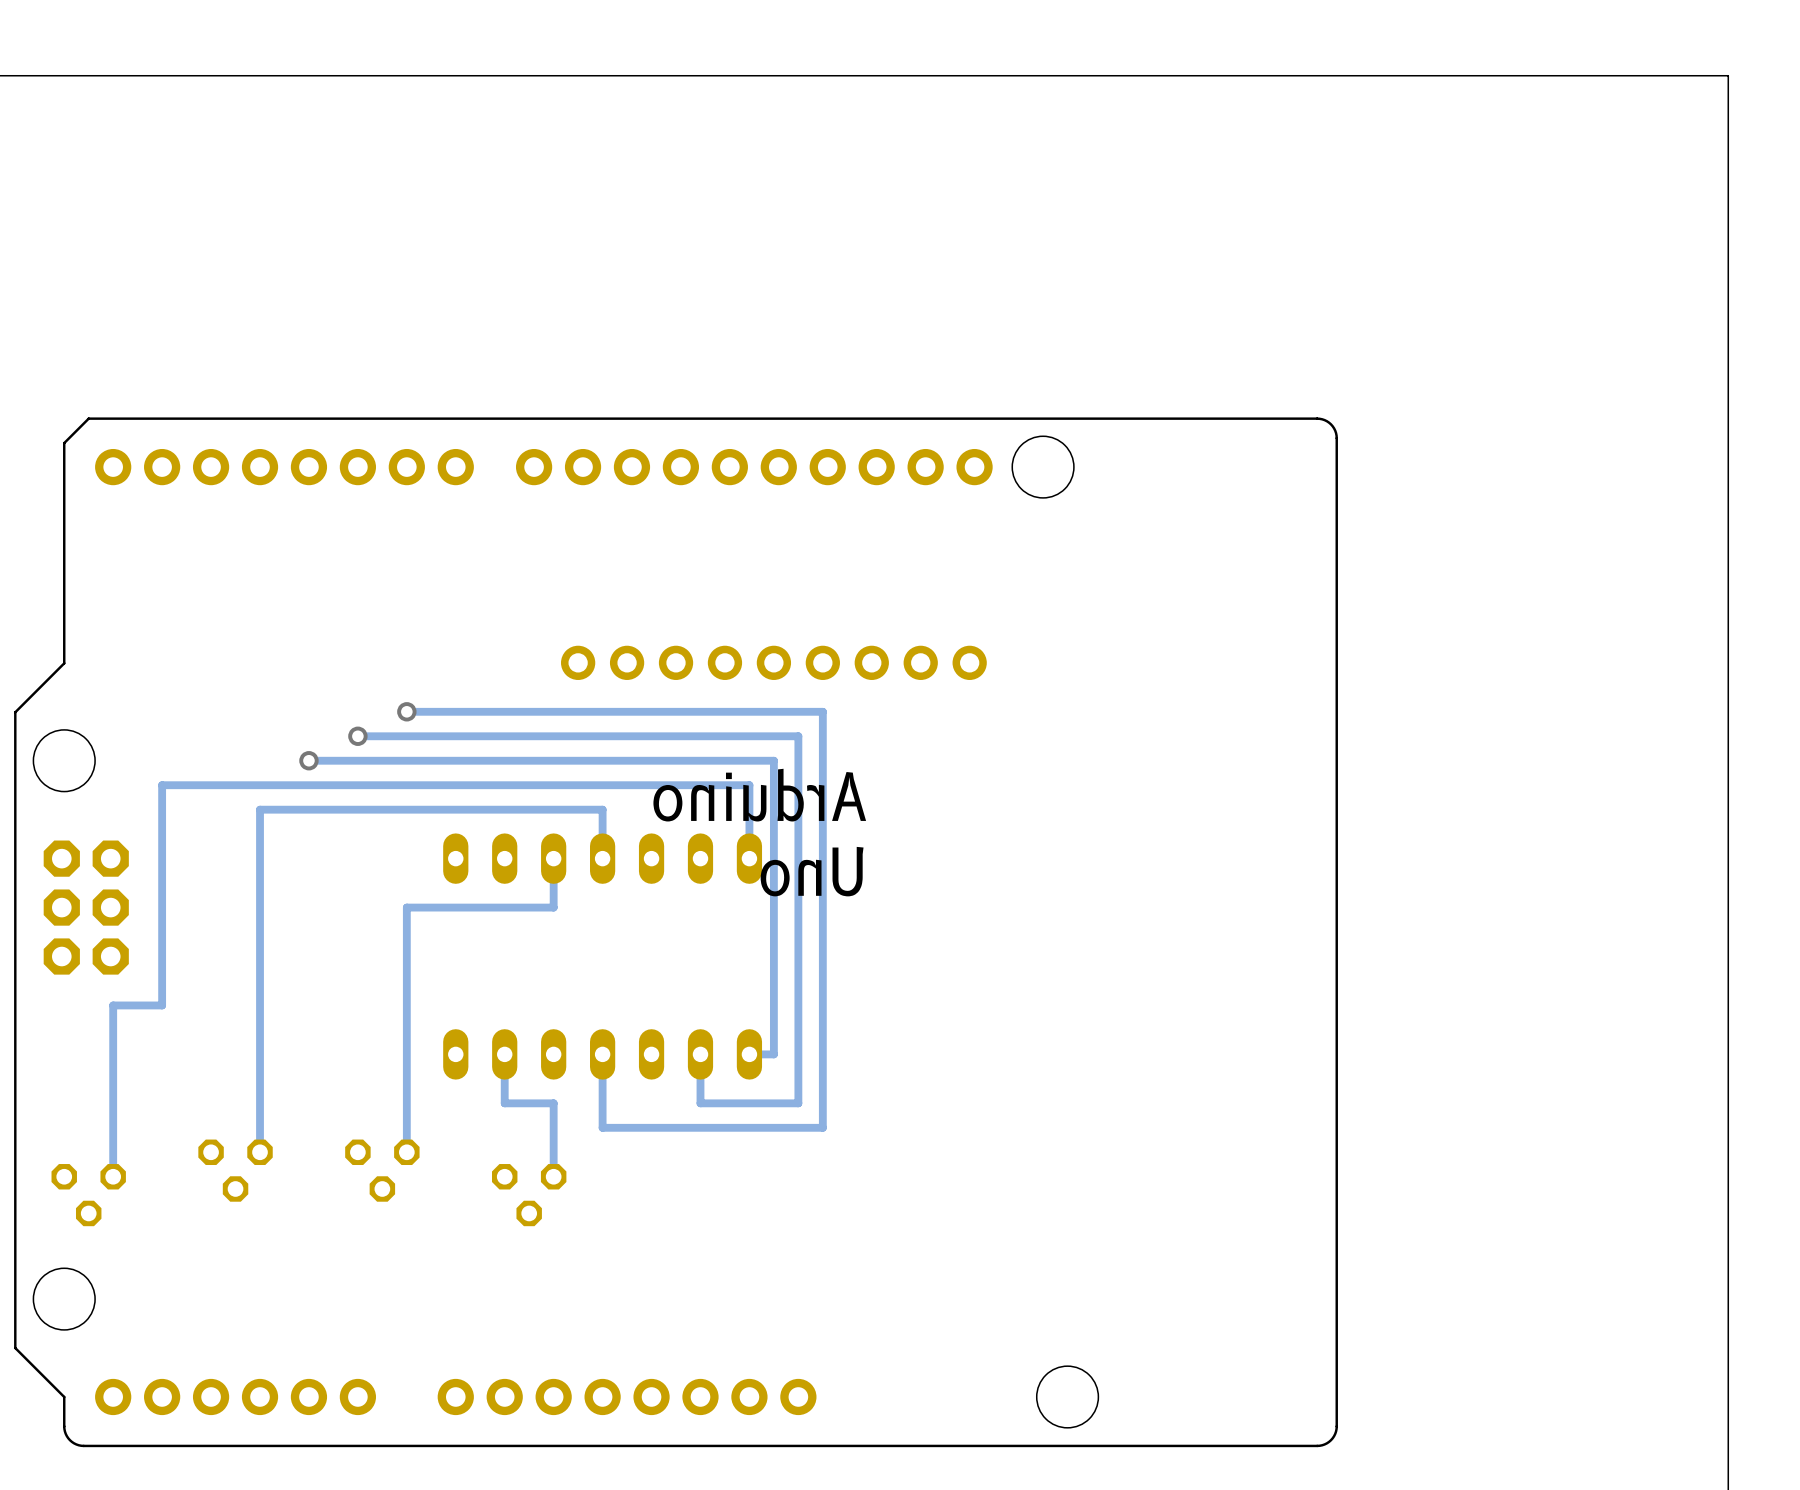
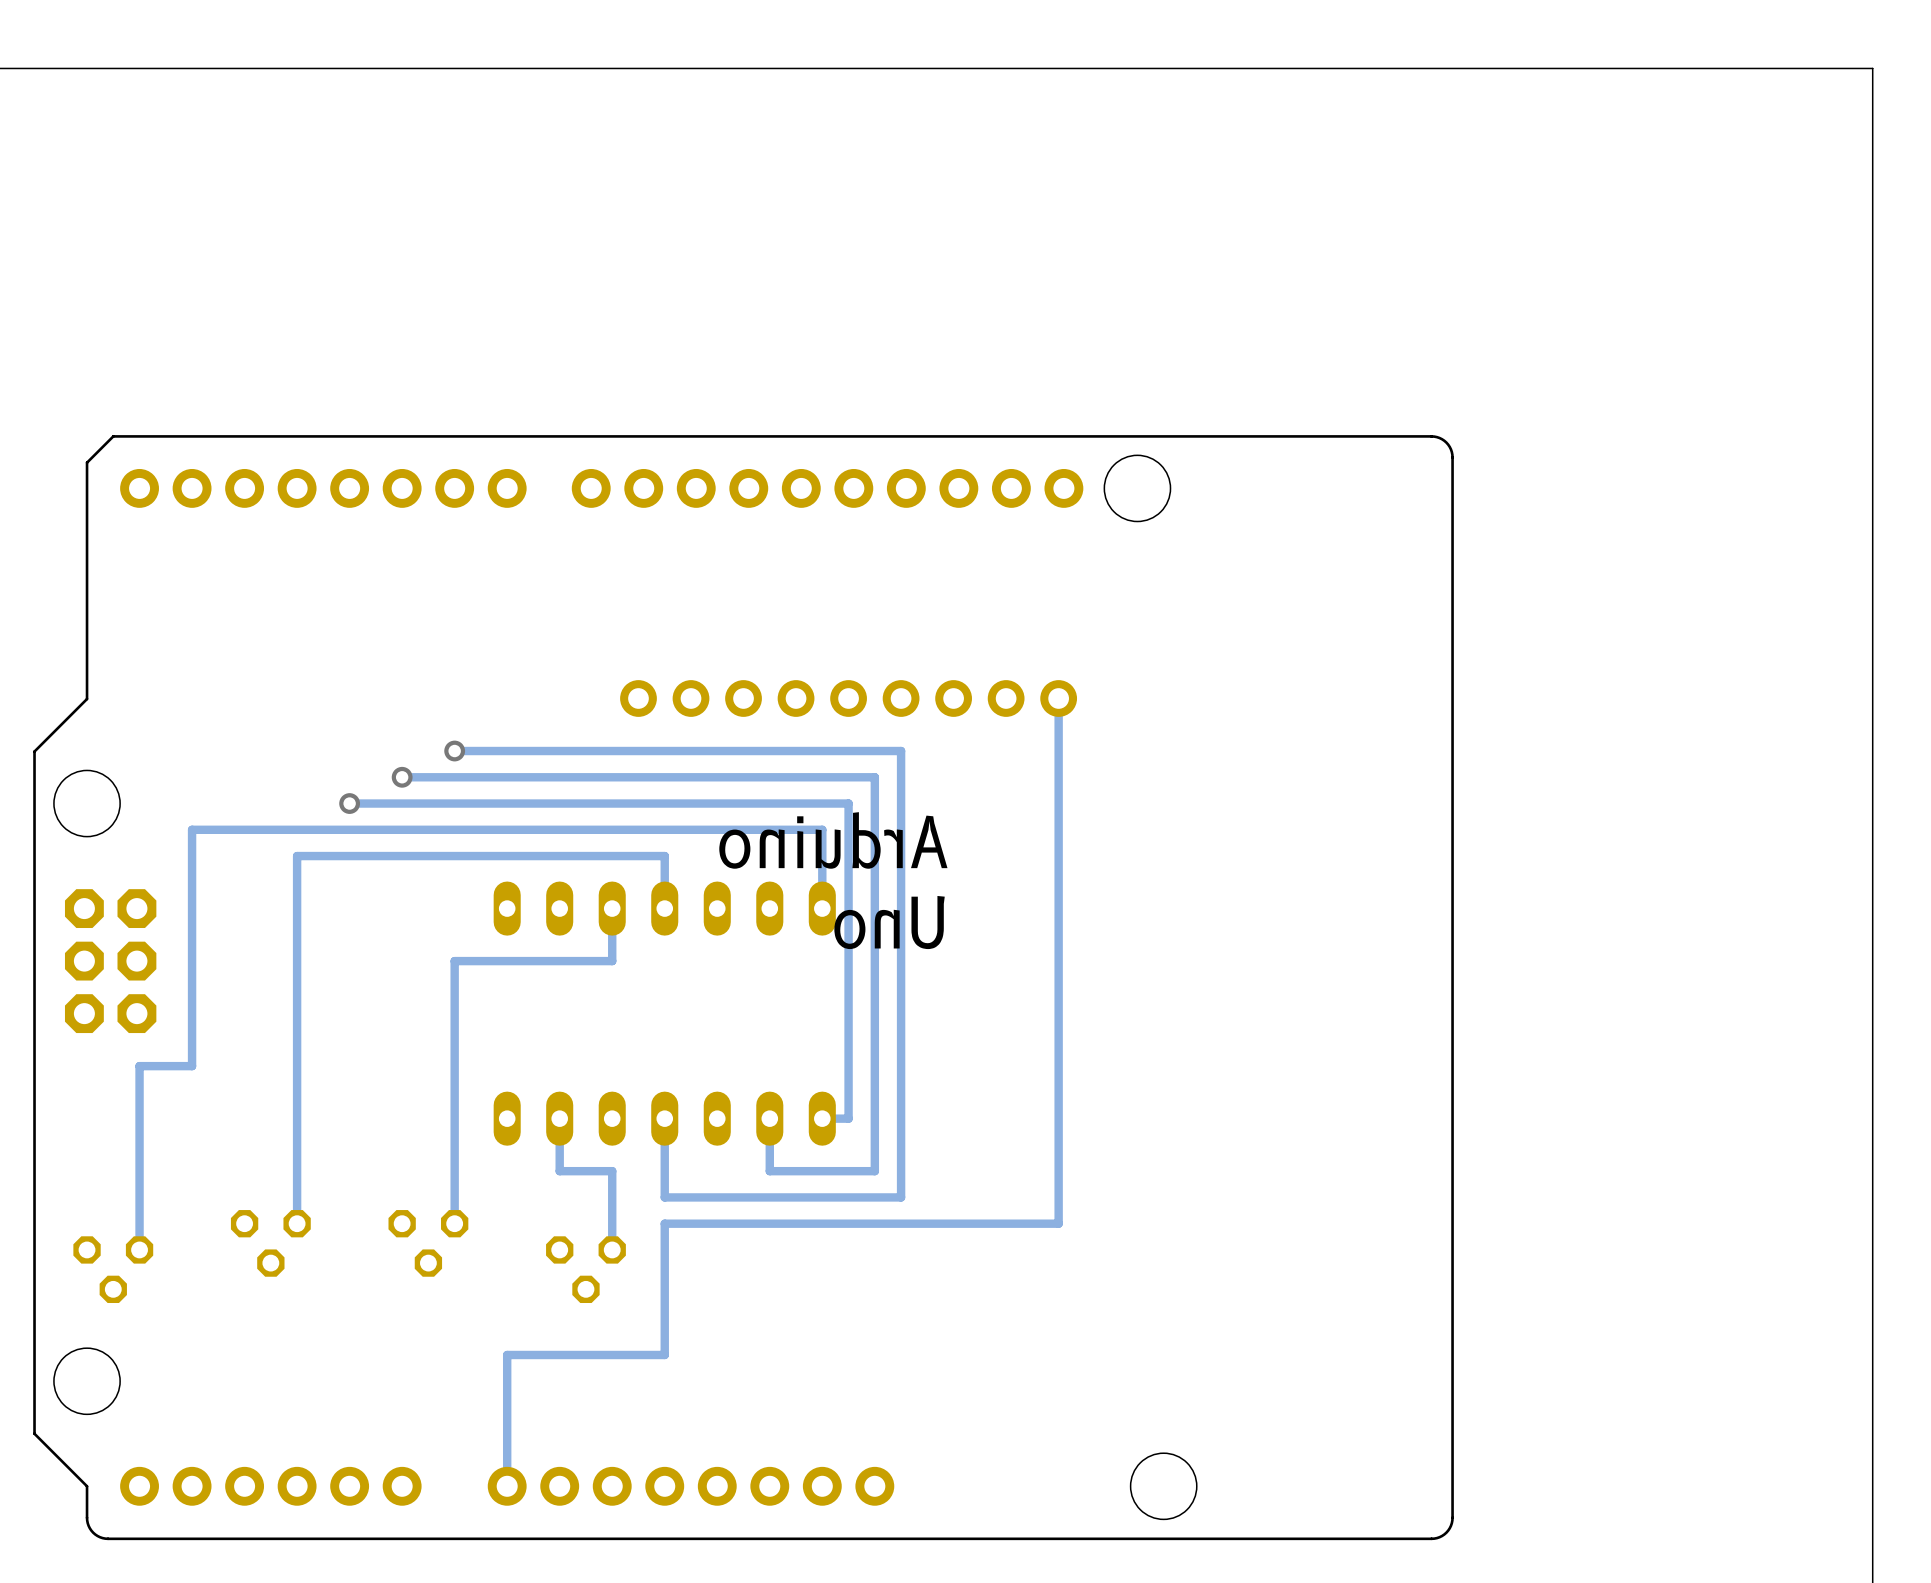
track: none -> (1058, 698) (1058, 1223) (664, 1223) (664, 1354) (507, 1354) (507, 1486)

